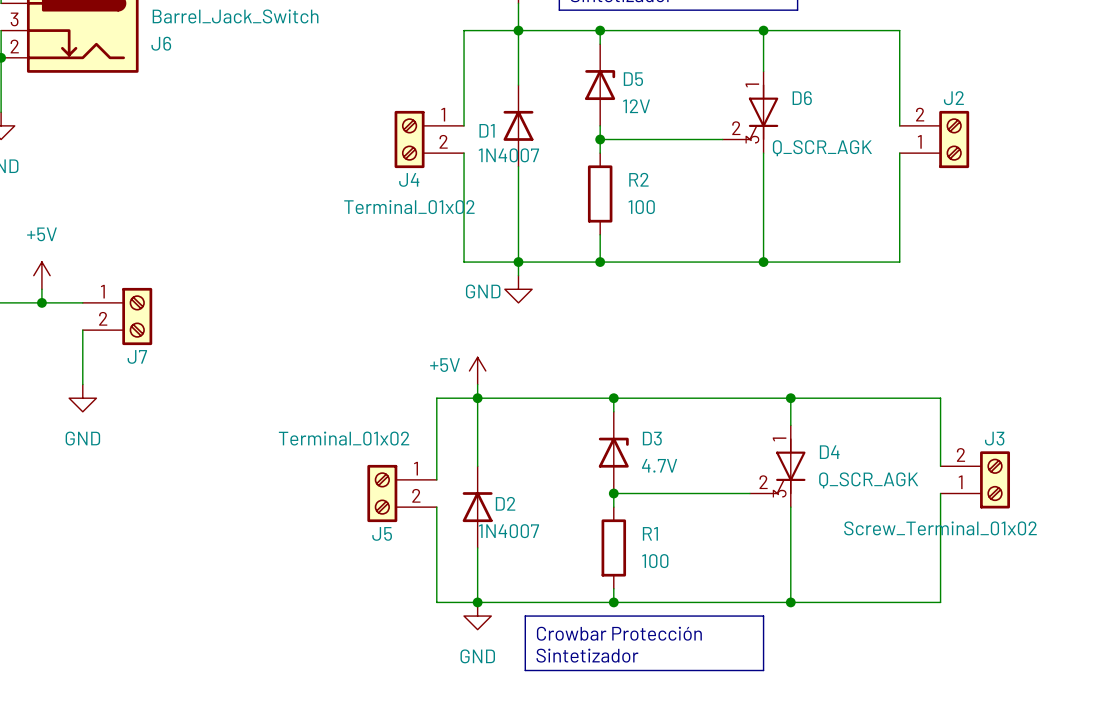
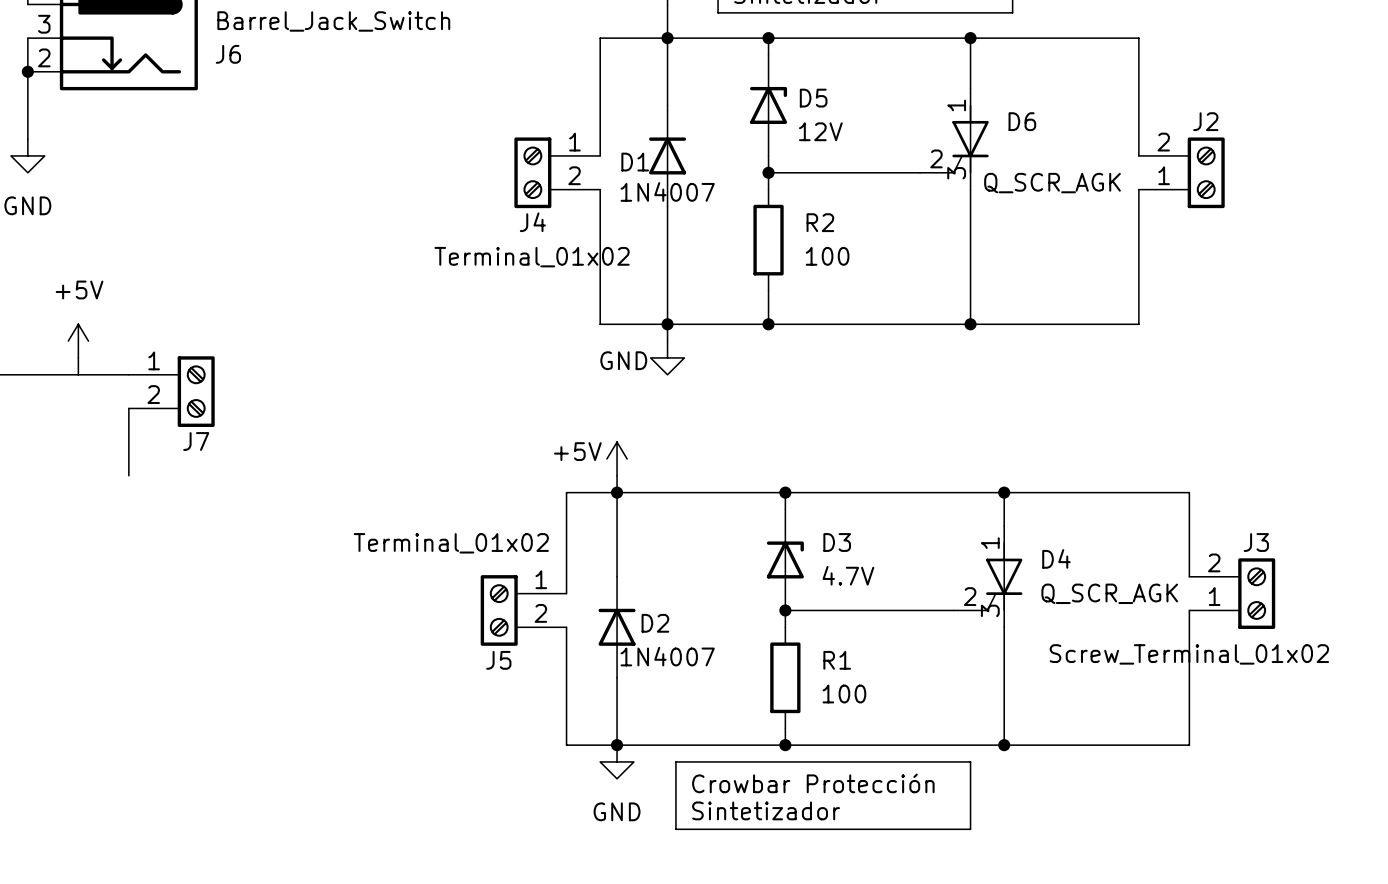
junction: (41, 302) -> none
power symbol: GND (82, 398) -> none

